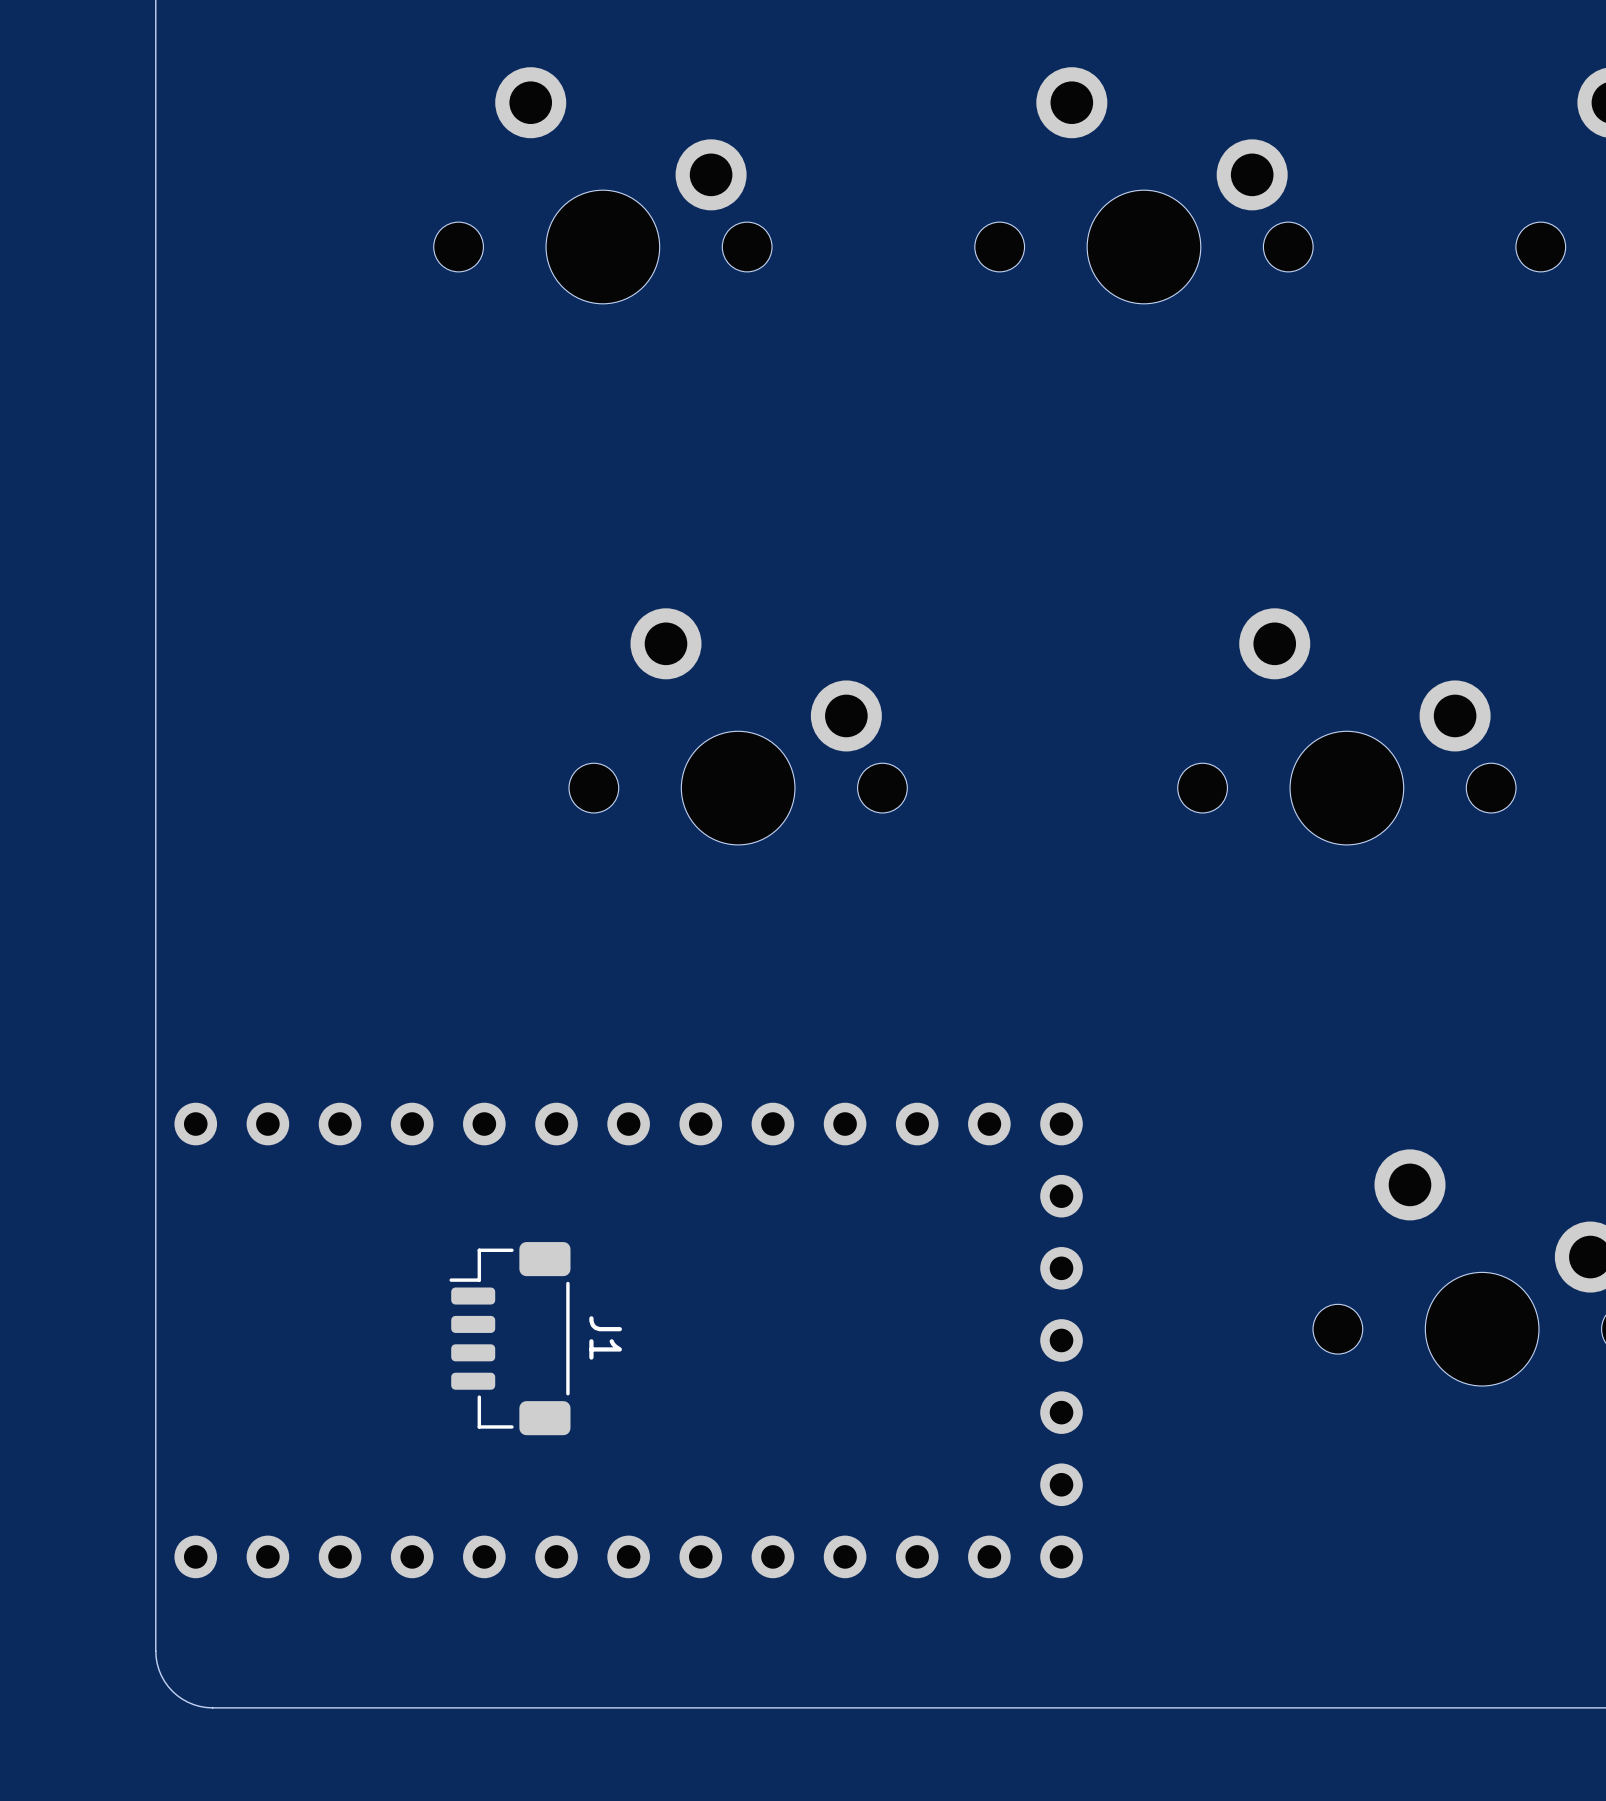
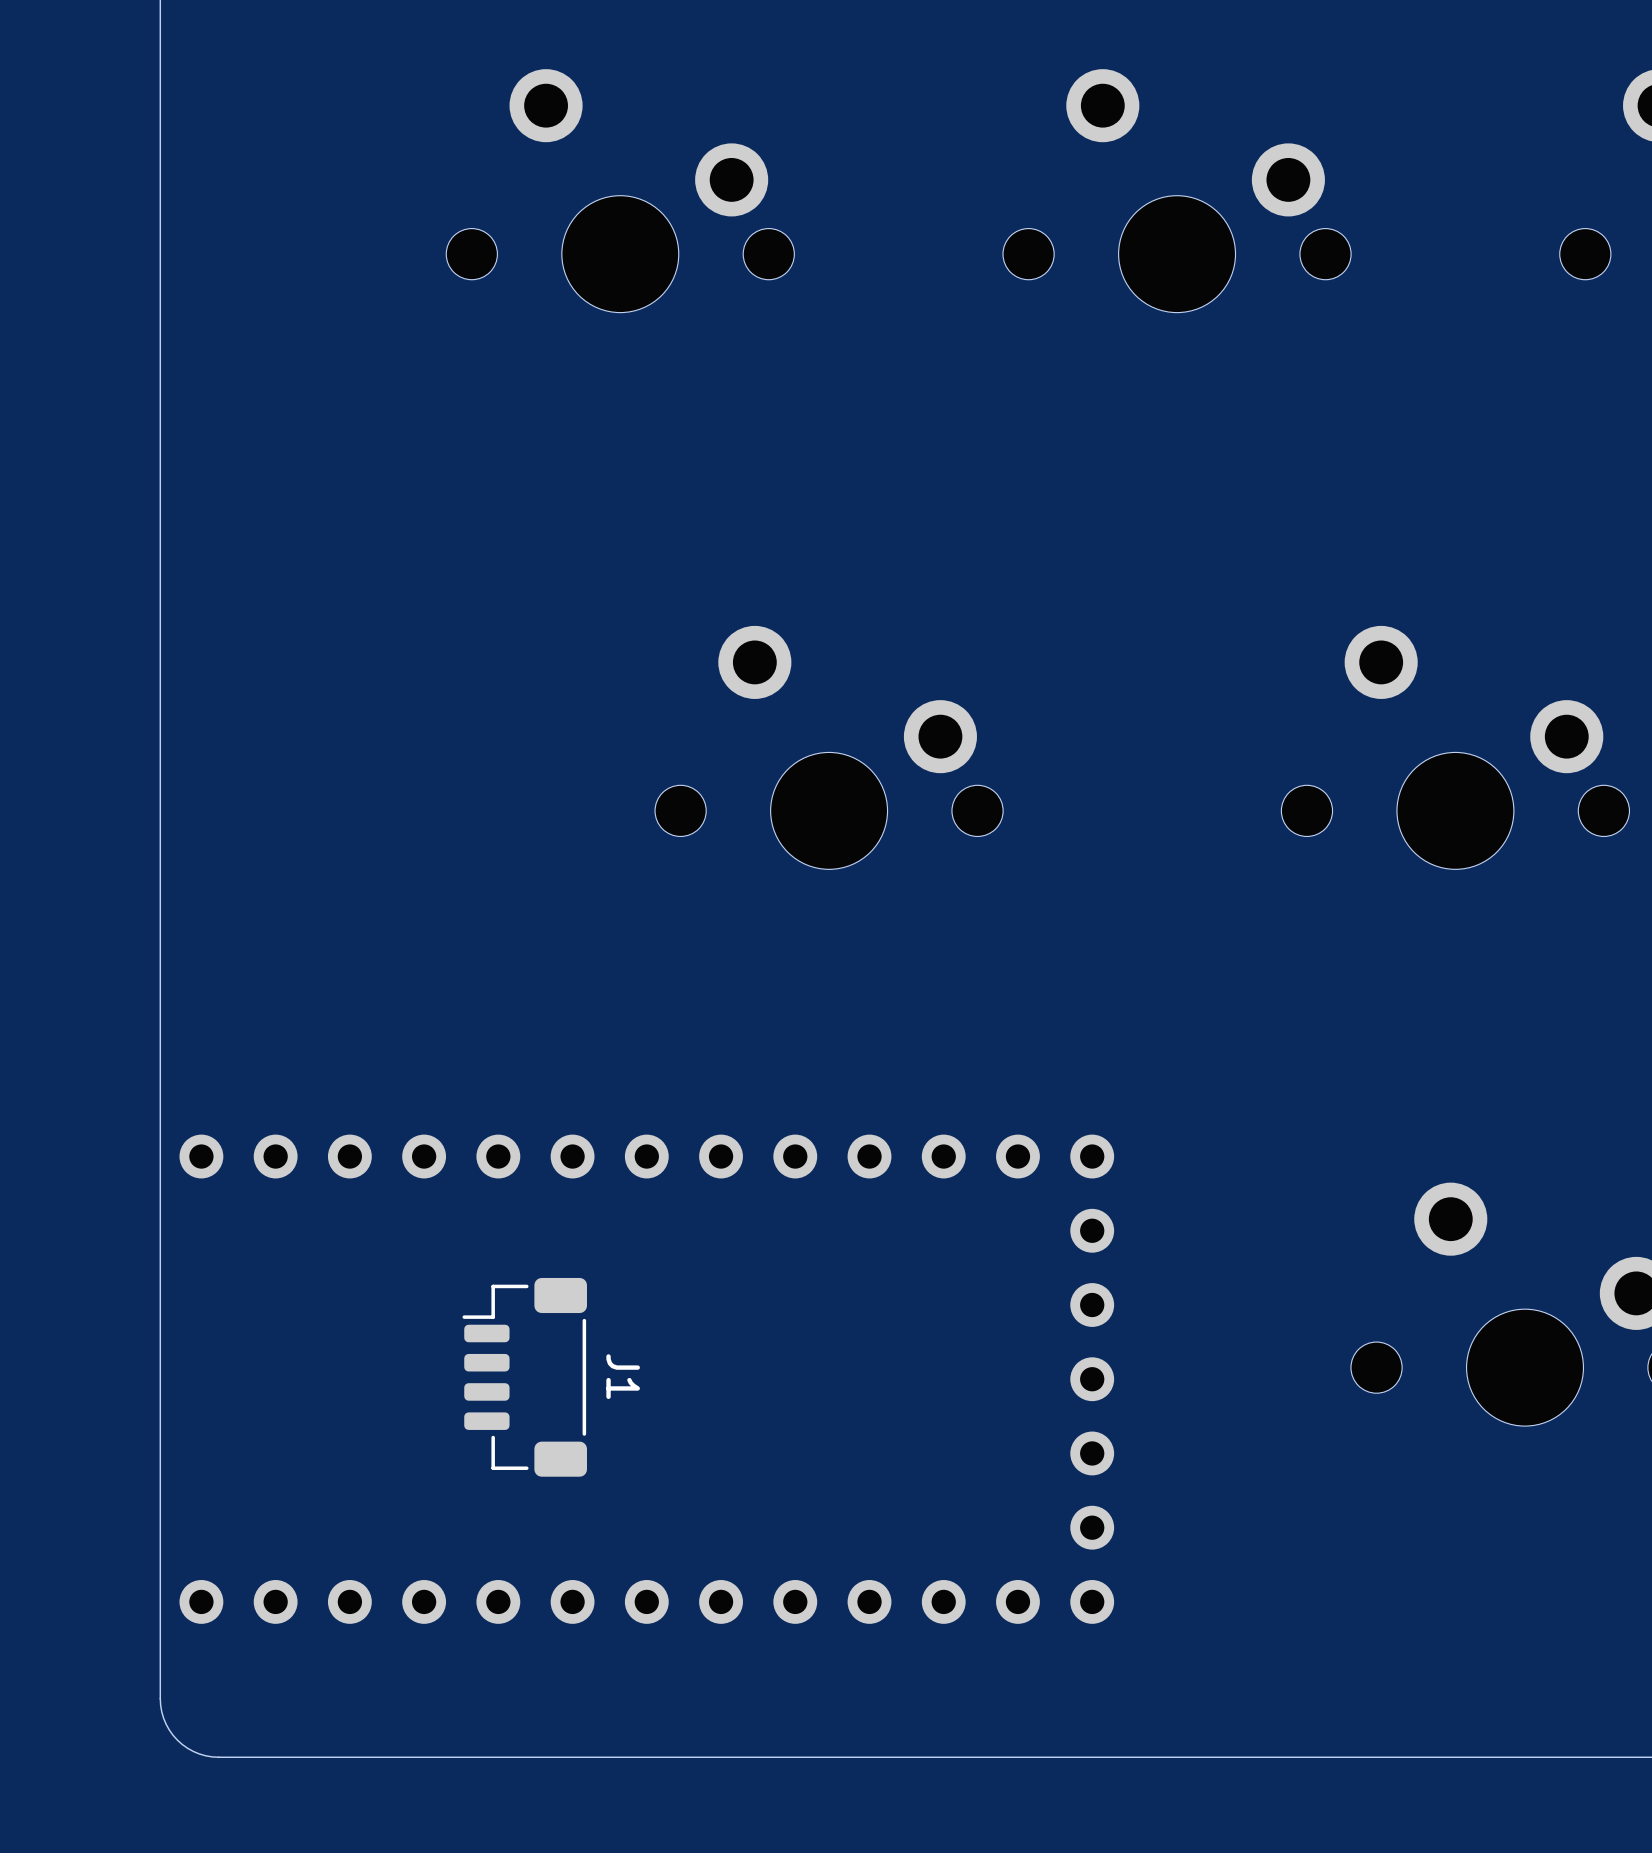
part position: (738, 726) -> (829, 747)
part position: (1346, 726) -> (1455, 747)

